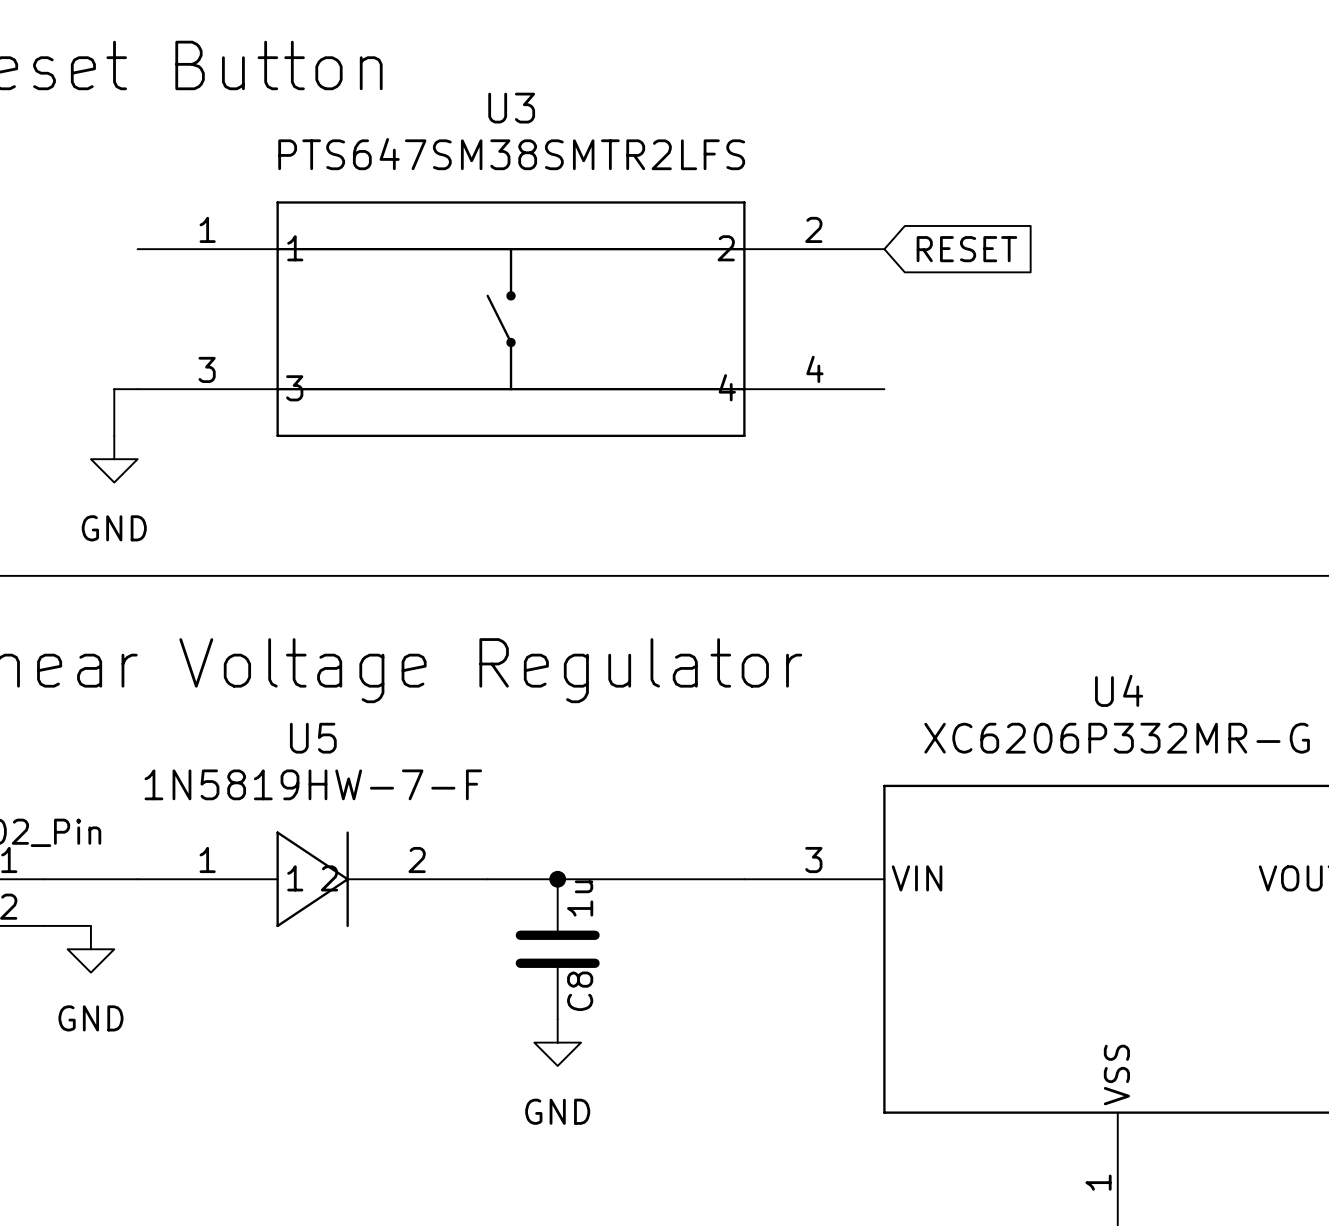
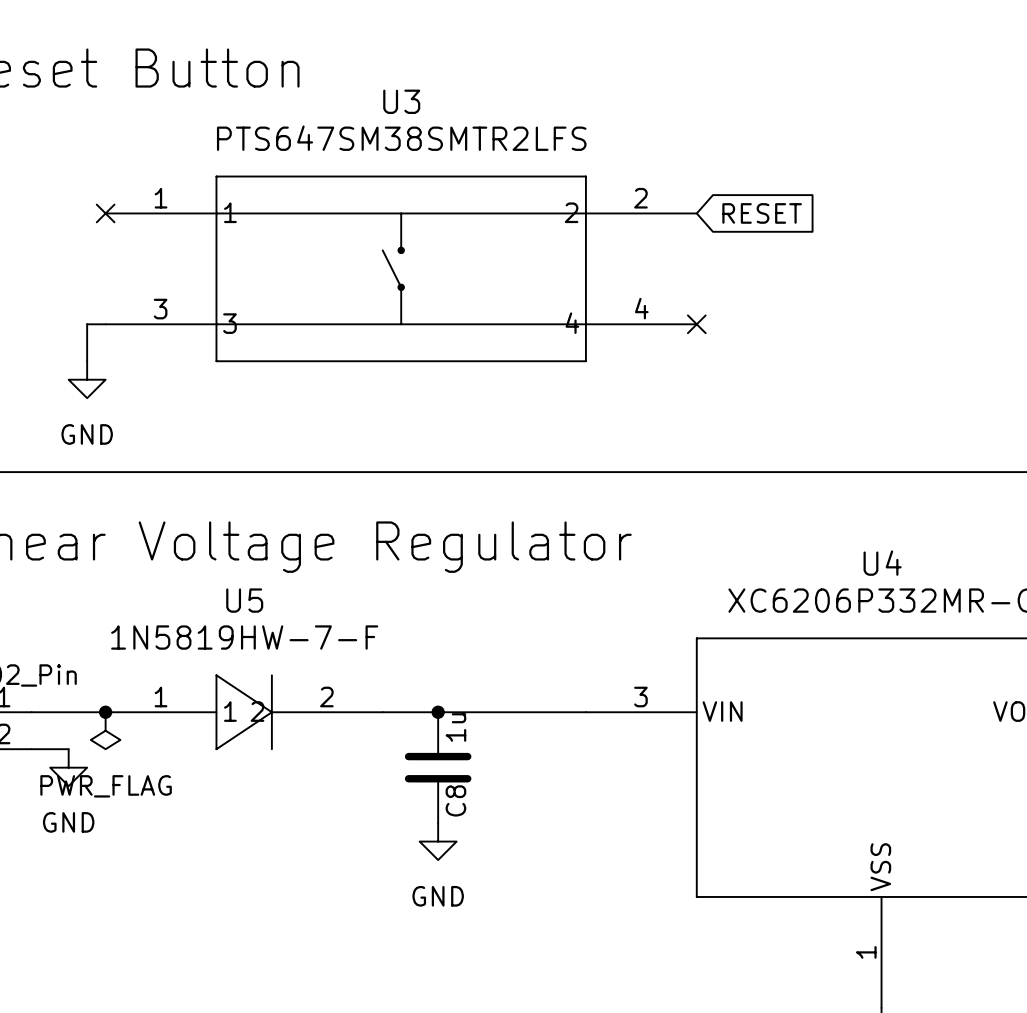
no-connect mark: none -> (105, 213)
no-connect mark: none -> (696, 324)
junction: none -> (105, 712)
power symbol: none -> PWR_FLAG (105, 730)

